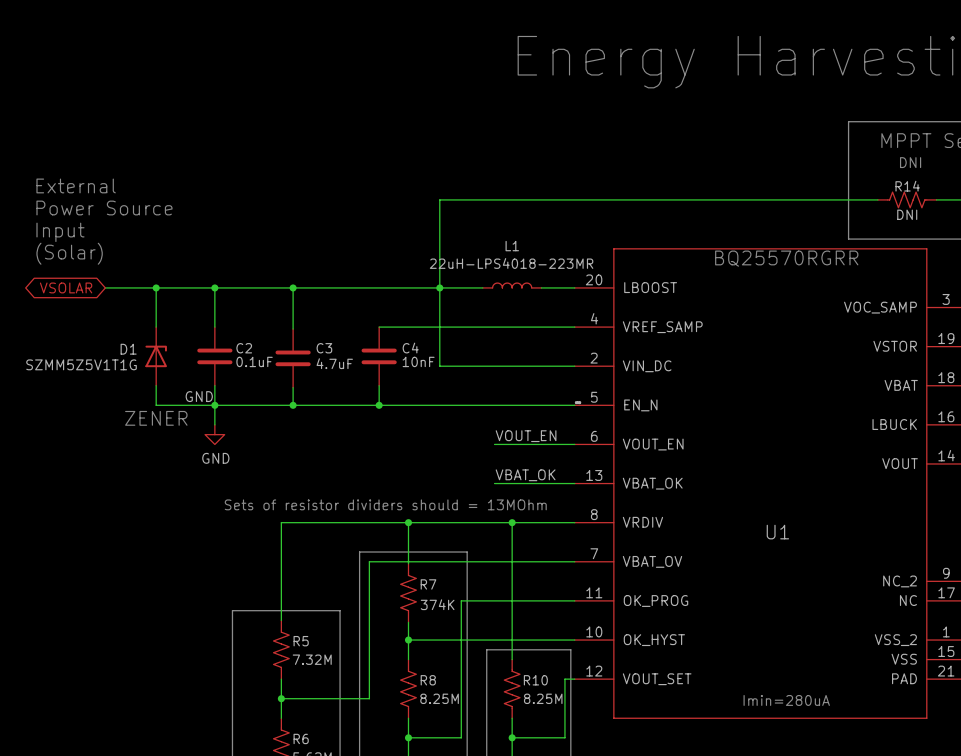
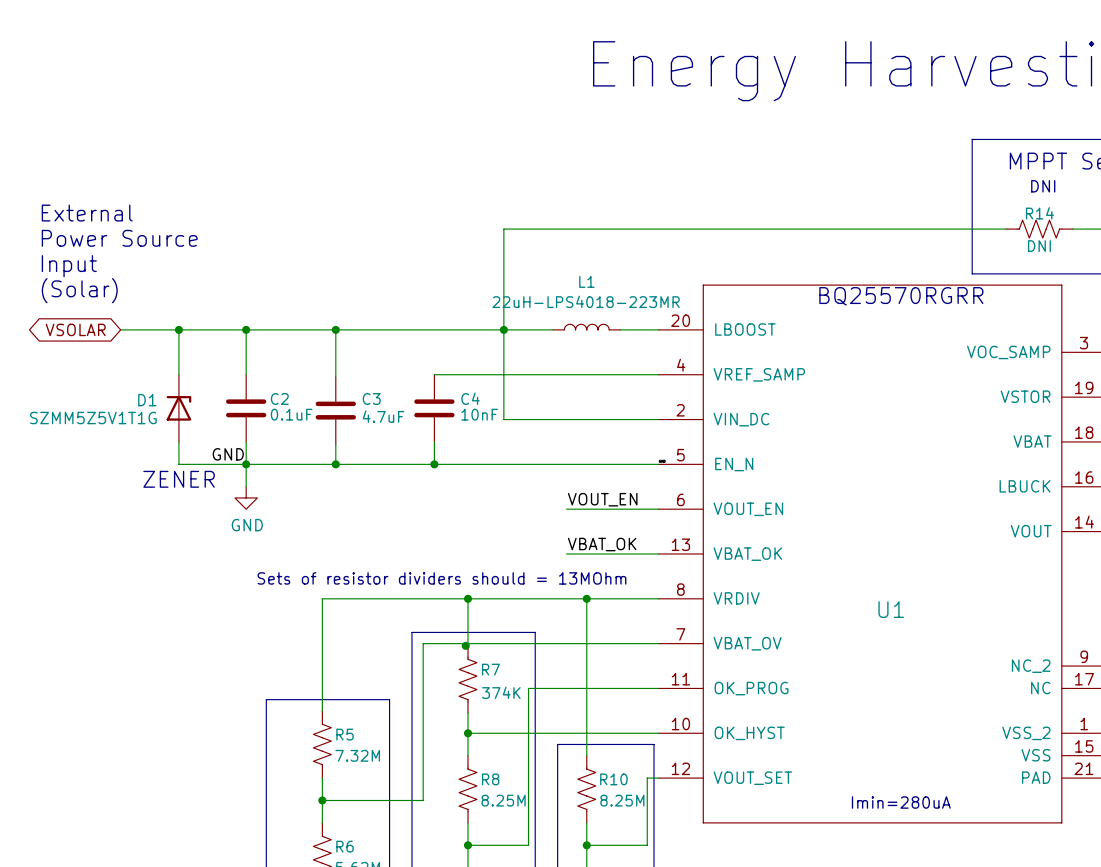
junction: none -> (465, 645)

